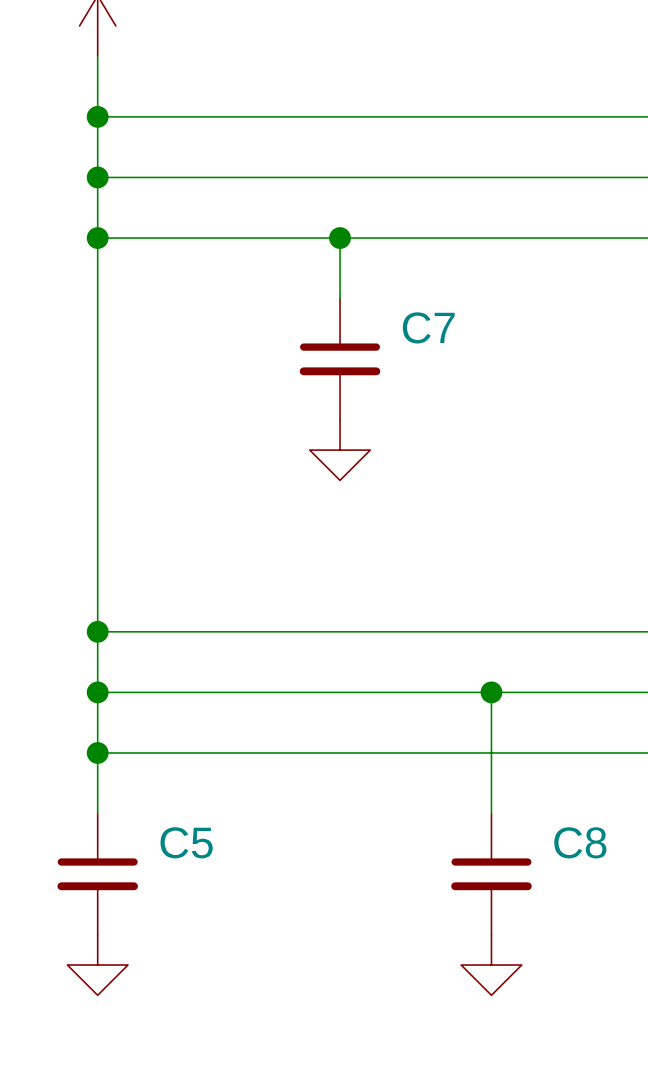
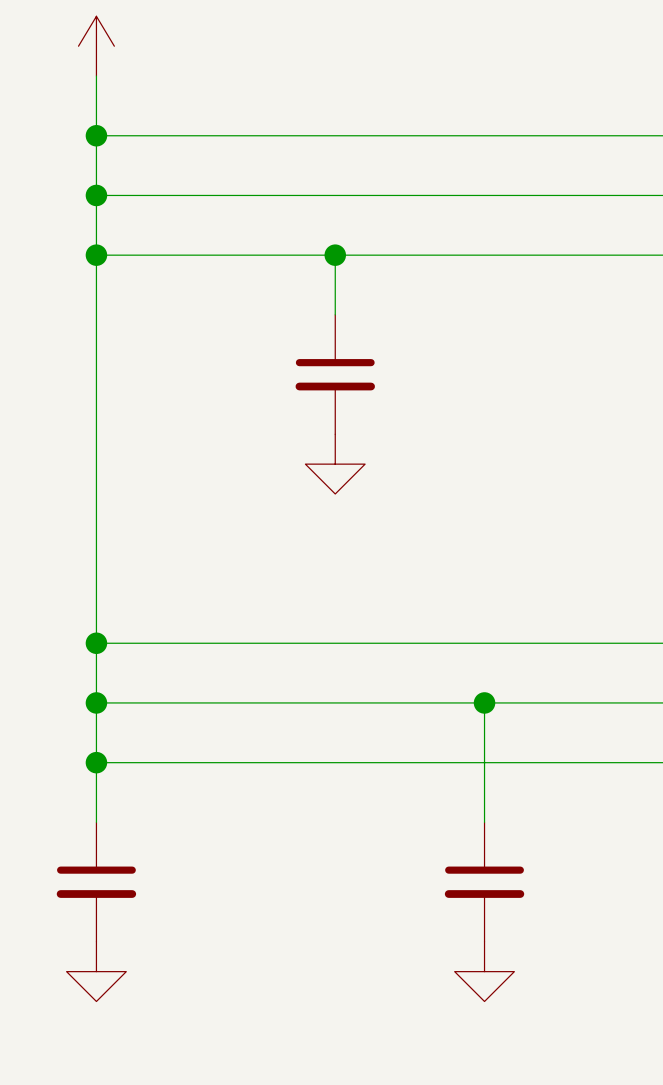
C7 name: C7 (428, 327) -> none
C5 name: C5 (186, 842) -> none
C8 name: C8 (580, 842) -> none

